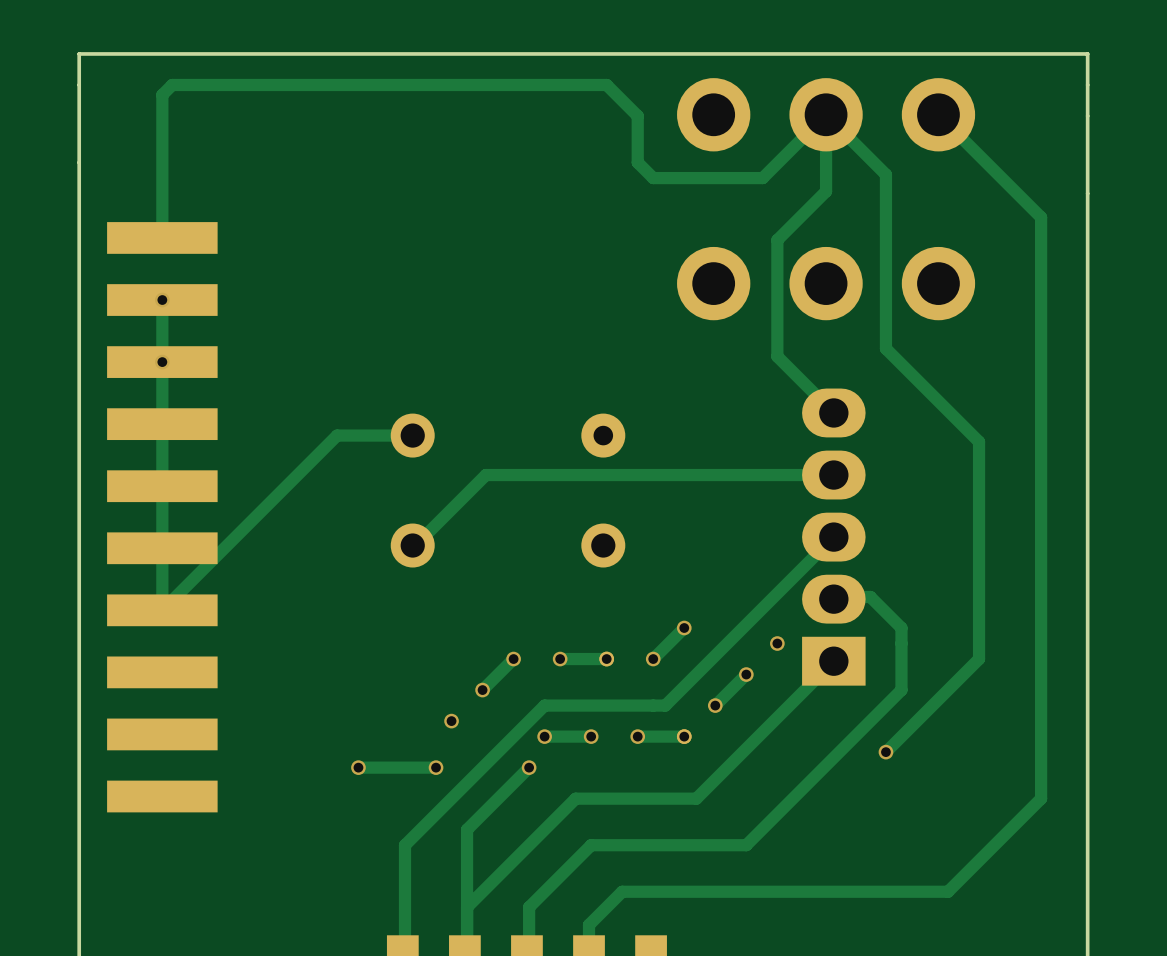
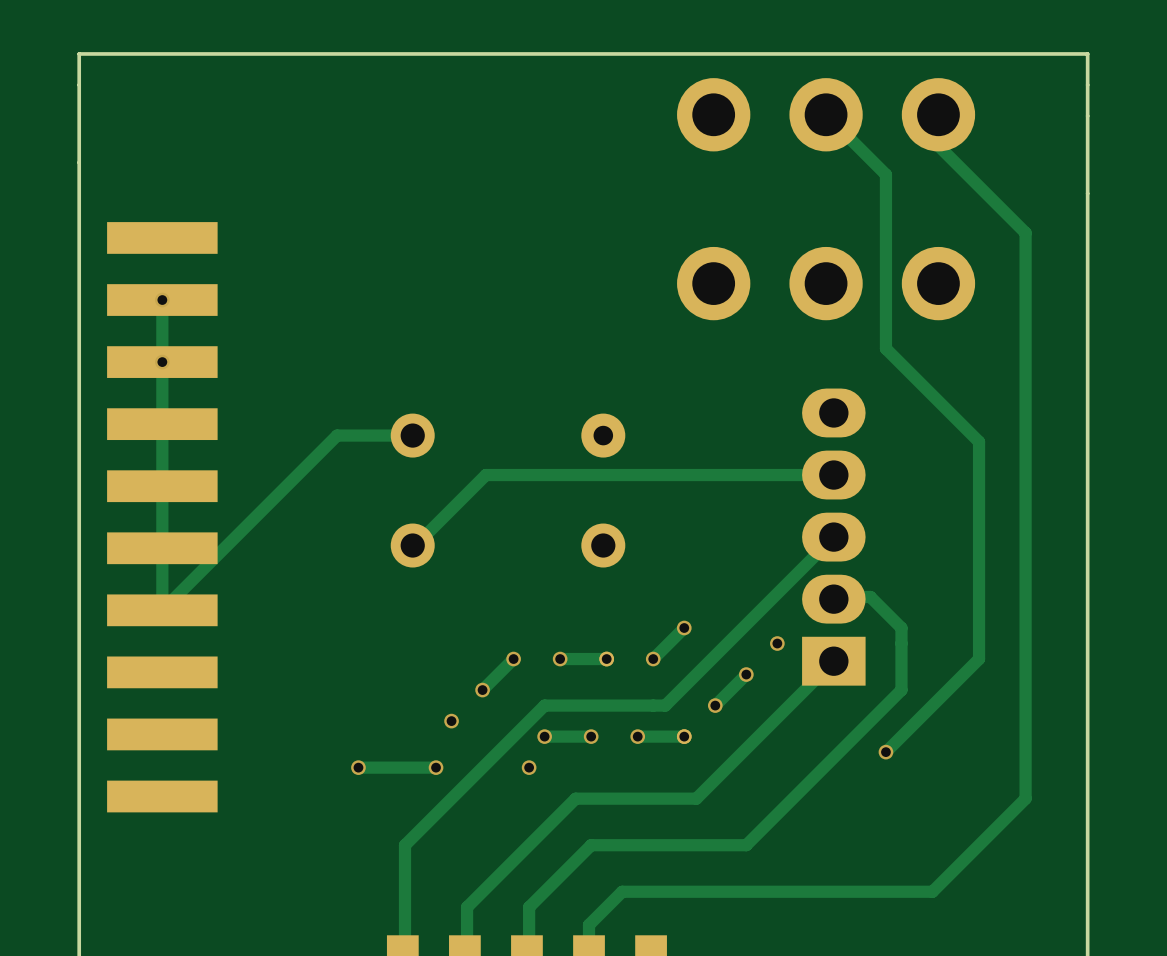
track: (938, 114) (1041, 217) (1041, 798) (948, 891) (932, 891) -> (938, 145) (1025, 232) (1025, 798) (932, 891)
track: (162, 237) (162, 94) (172, 84) (606, 84) (637, 116) (637, 162) (653, 178) (762, 178) (826, 114) (826, 191) (777, 240) (777, 356) (833, 412) -> none
track: (529, 767) (467, 829) (467, 907) -> none

